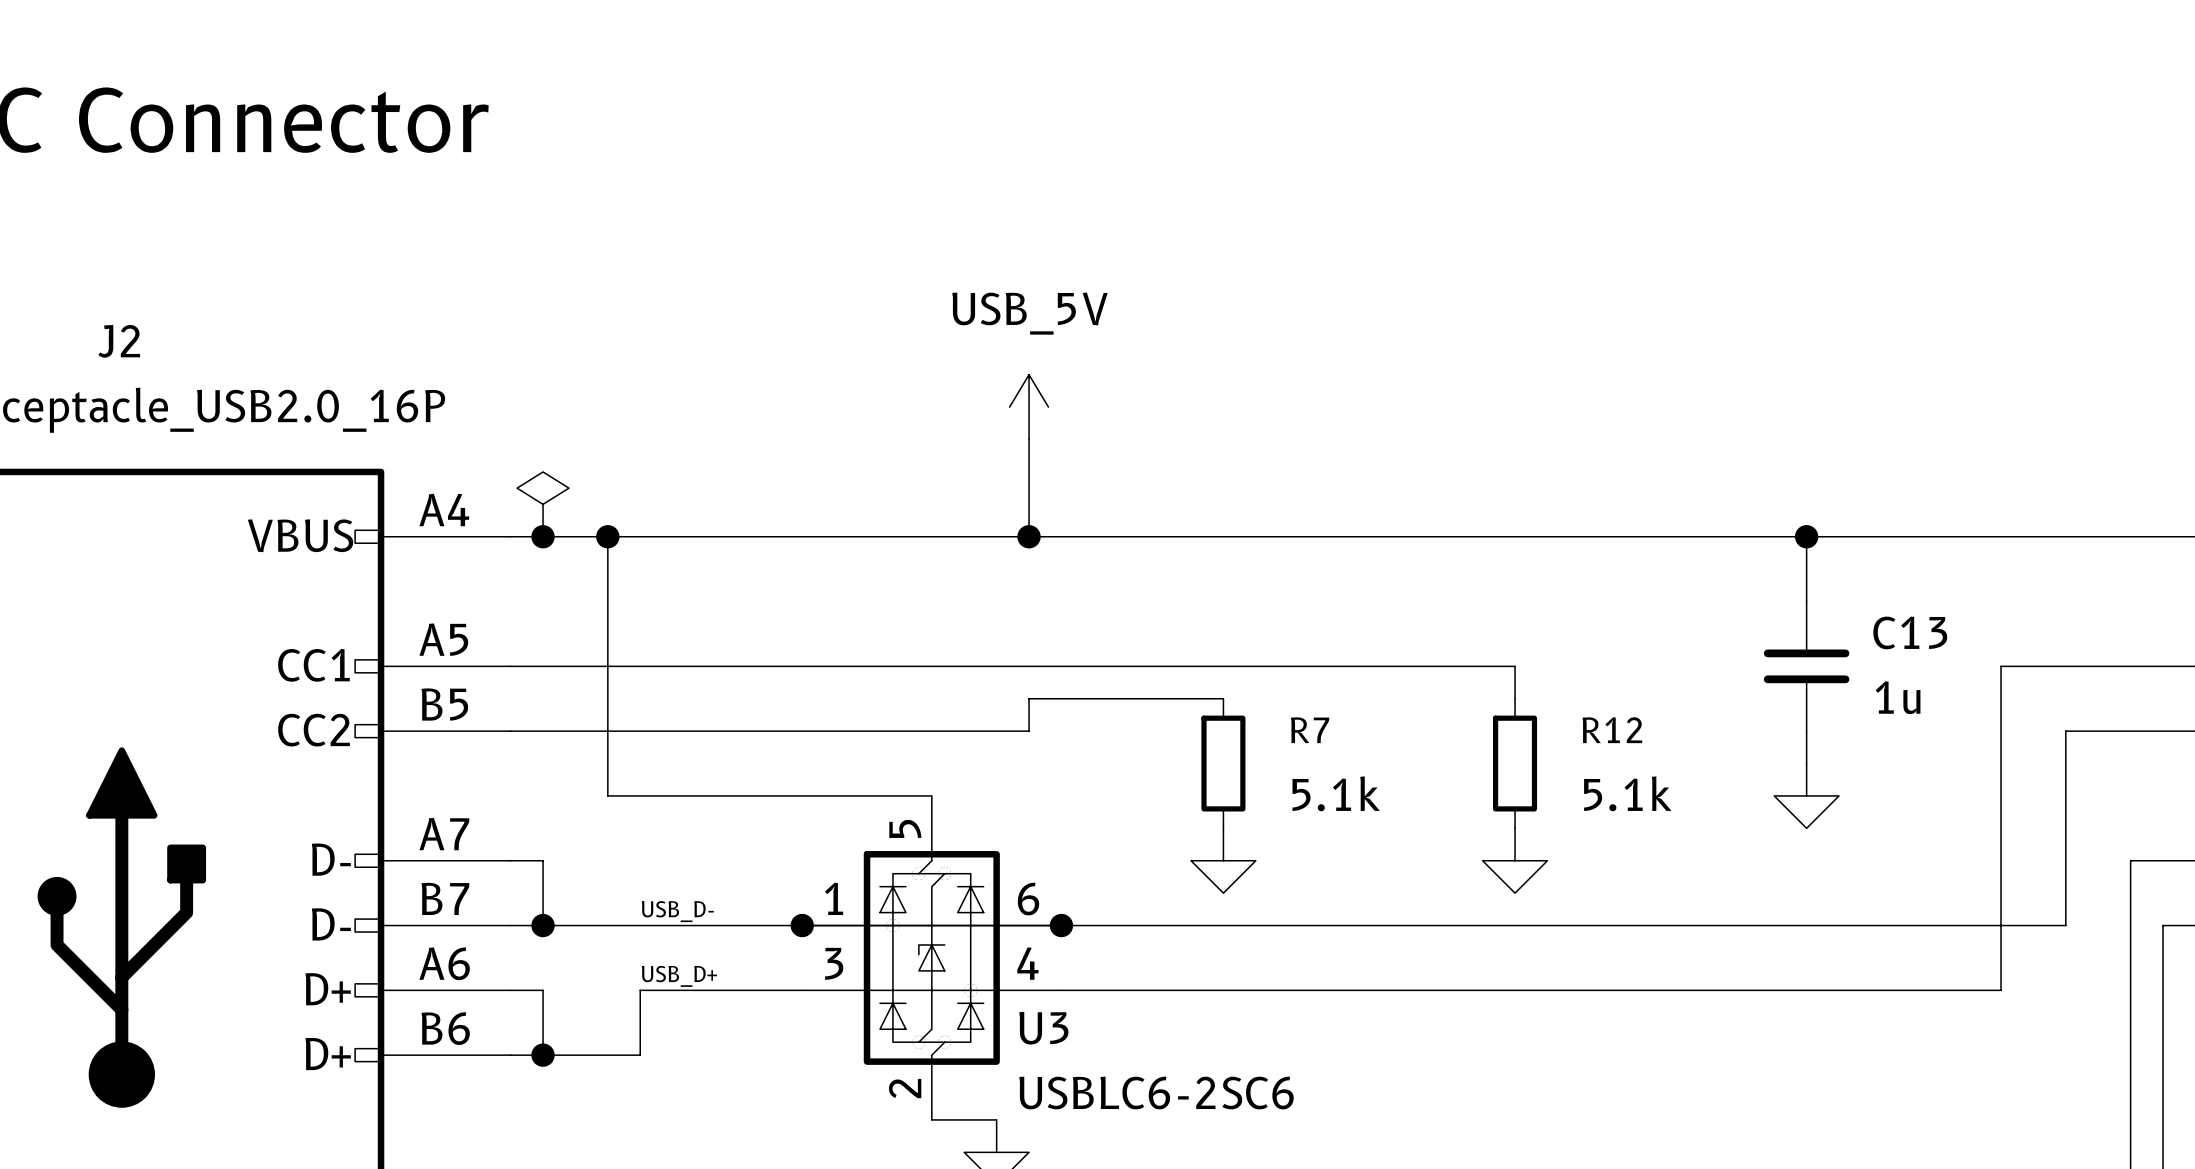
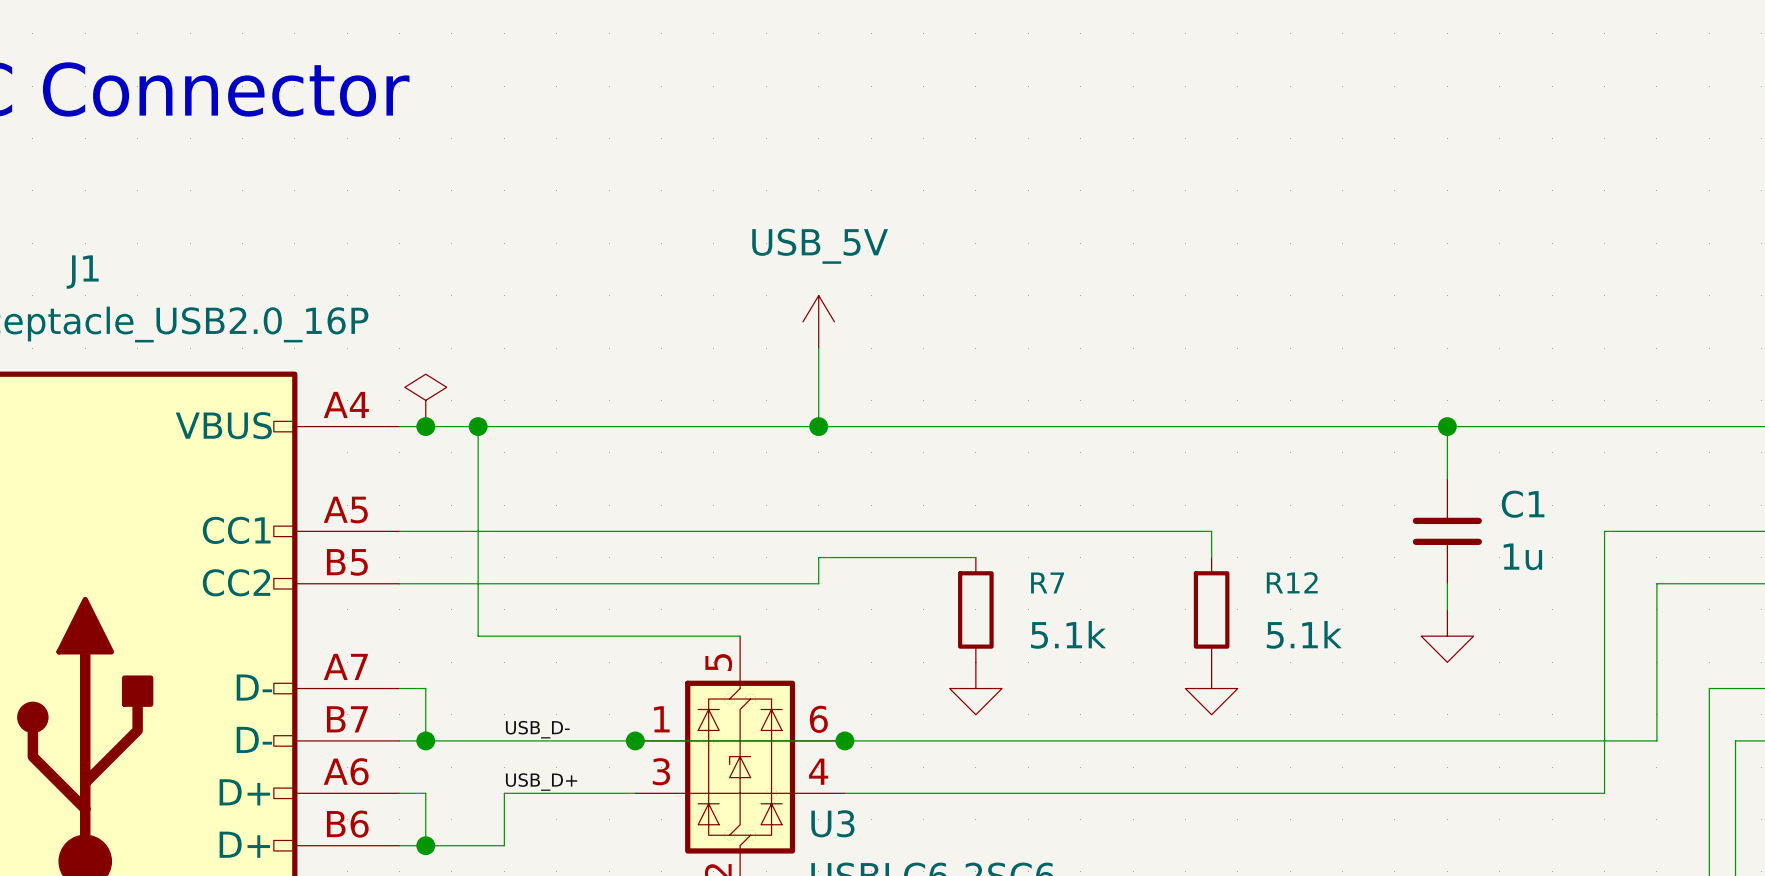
J2 name: J2 (119, 341) -> J1 (82, 272)
C13 name: C13 (1910, 632) -> C1 (1523, 504)

